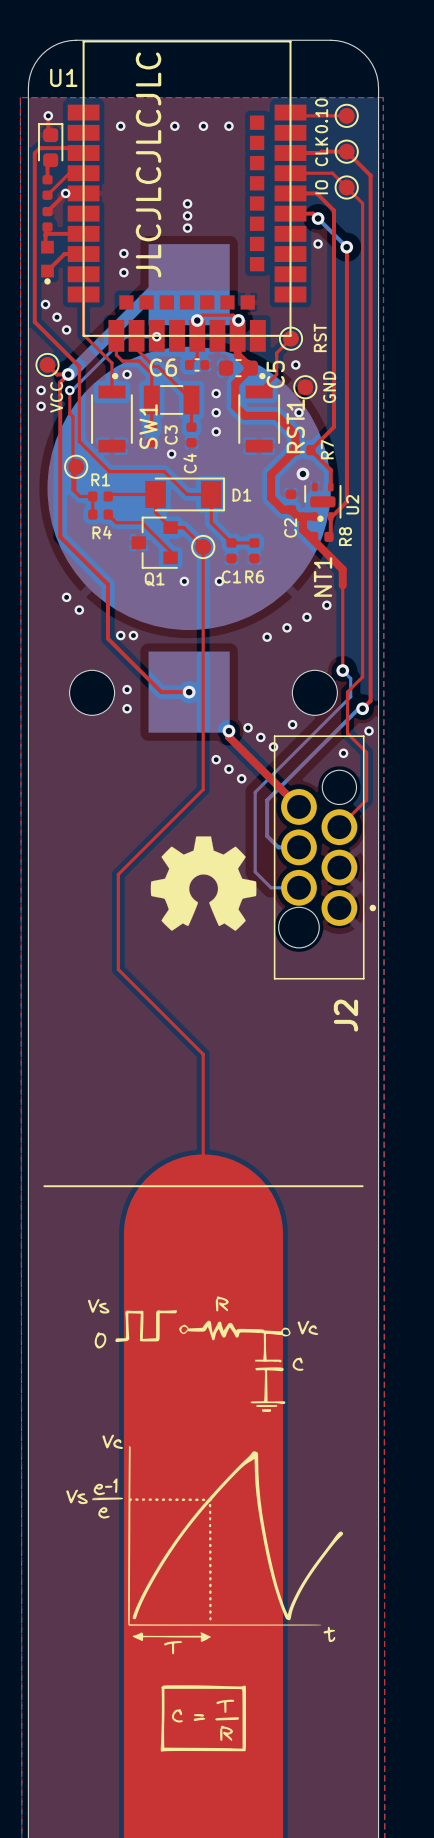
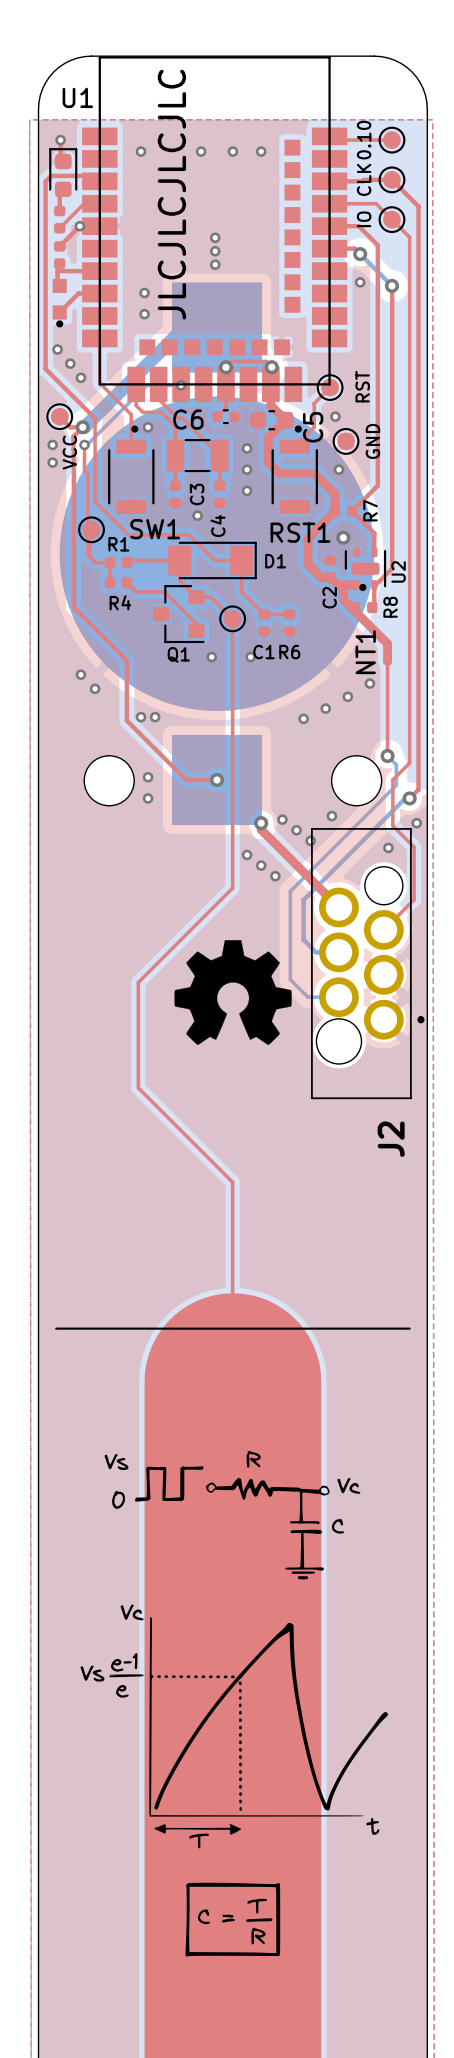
SW1 name rotation: 0° (148, 426) -> 90° clockwise (155, 529)
RST1 name rotation: 0° (295, 426) -> 90° clockwise (300, 532)

